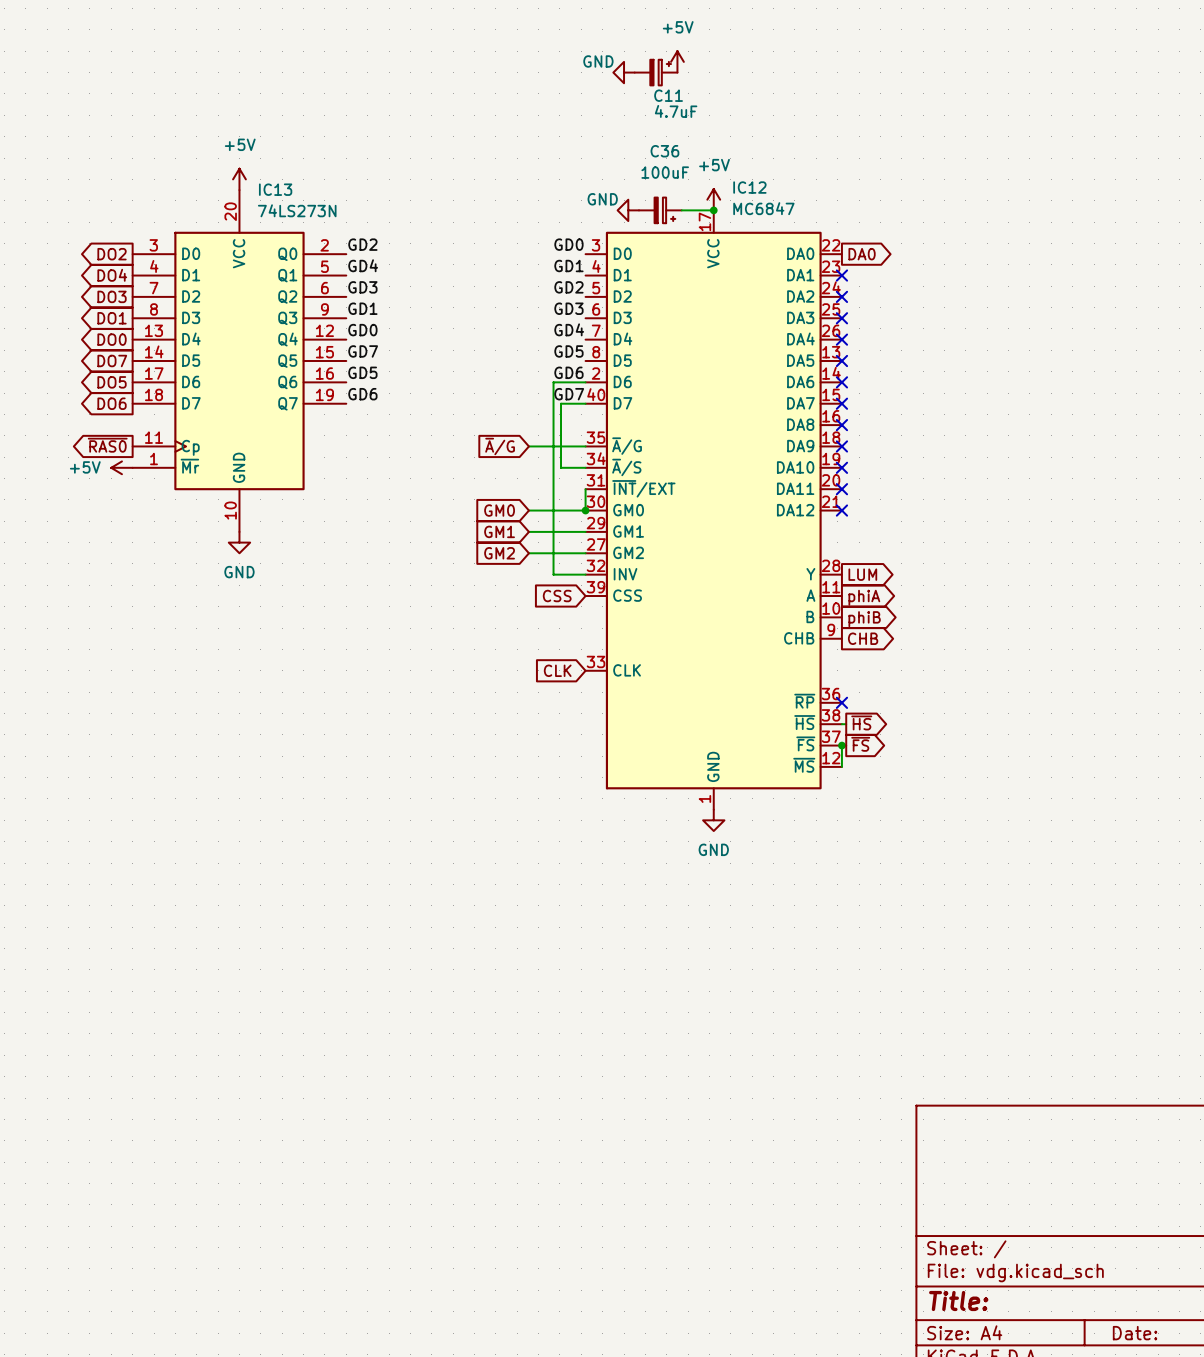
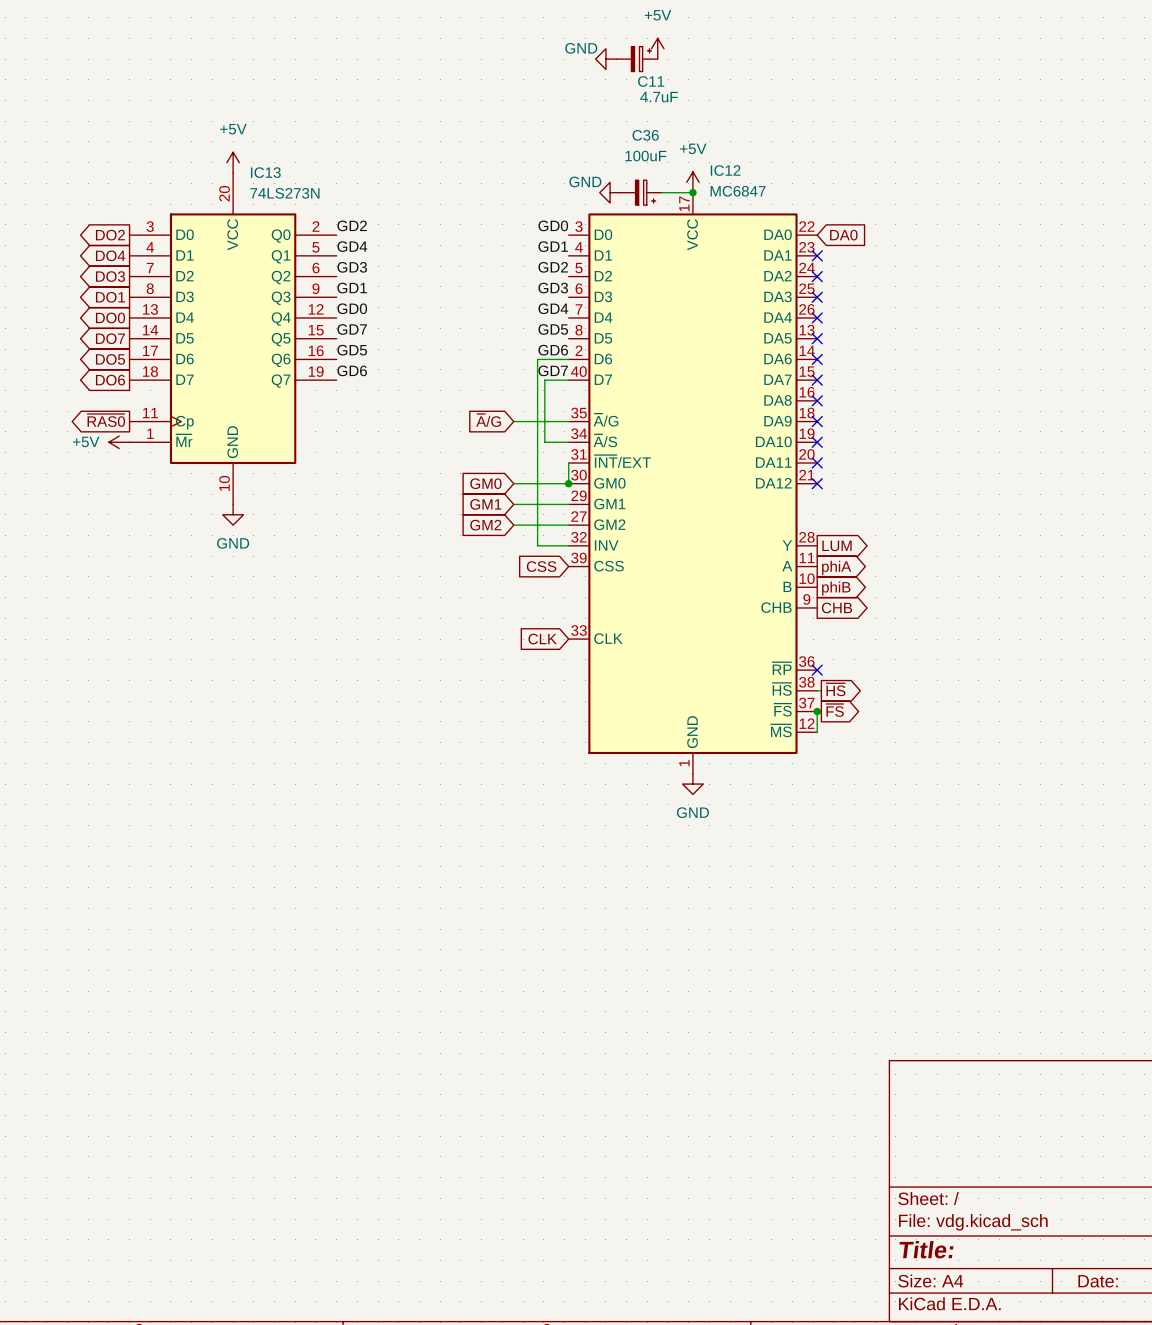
global label shape: output (862, 254) -> input (843, 235)

